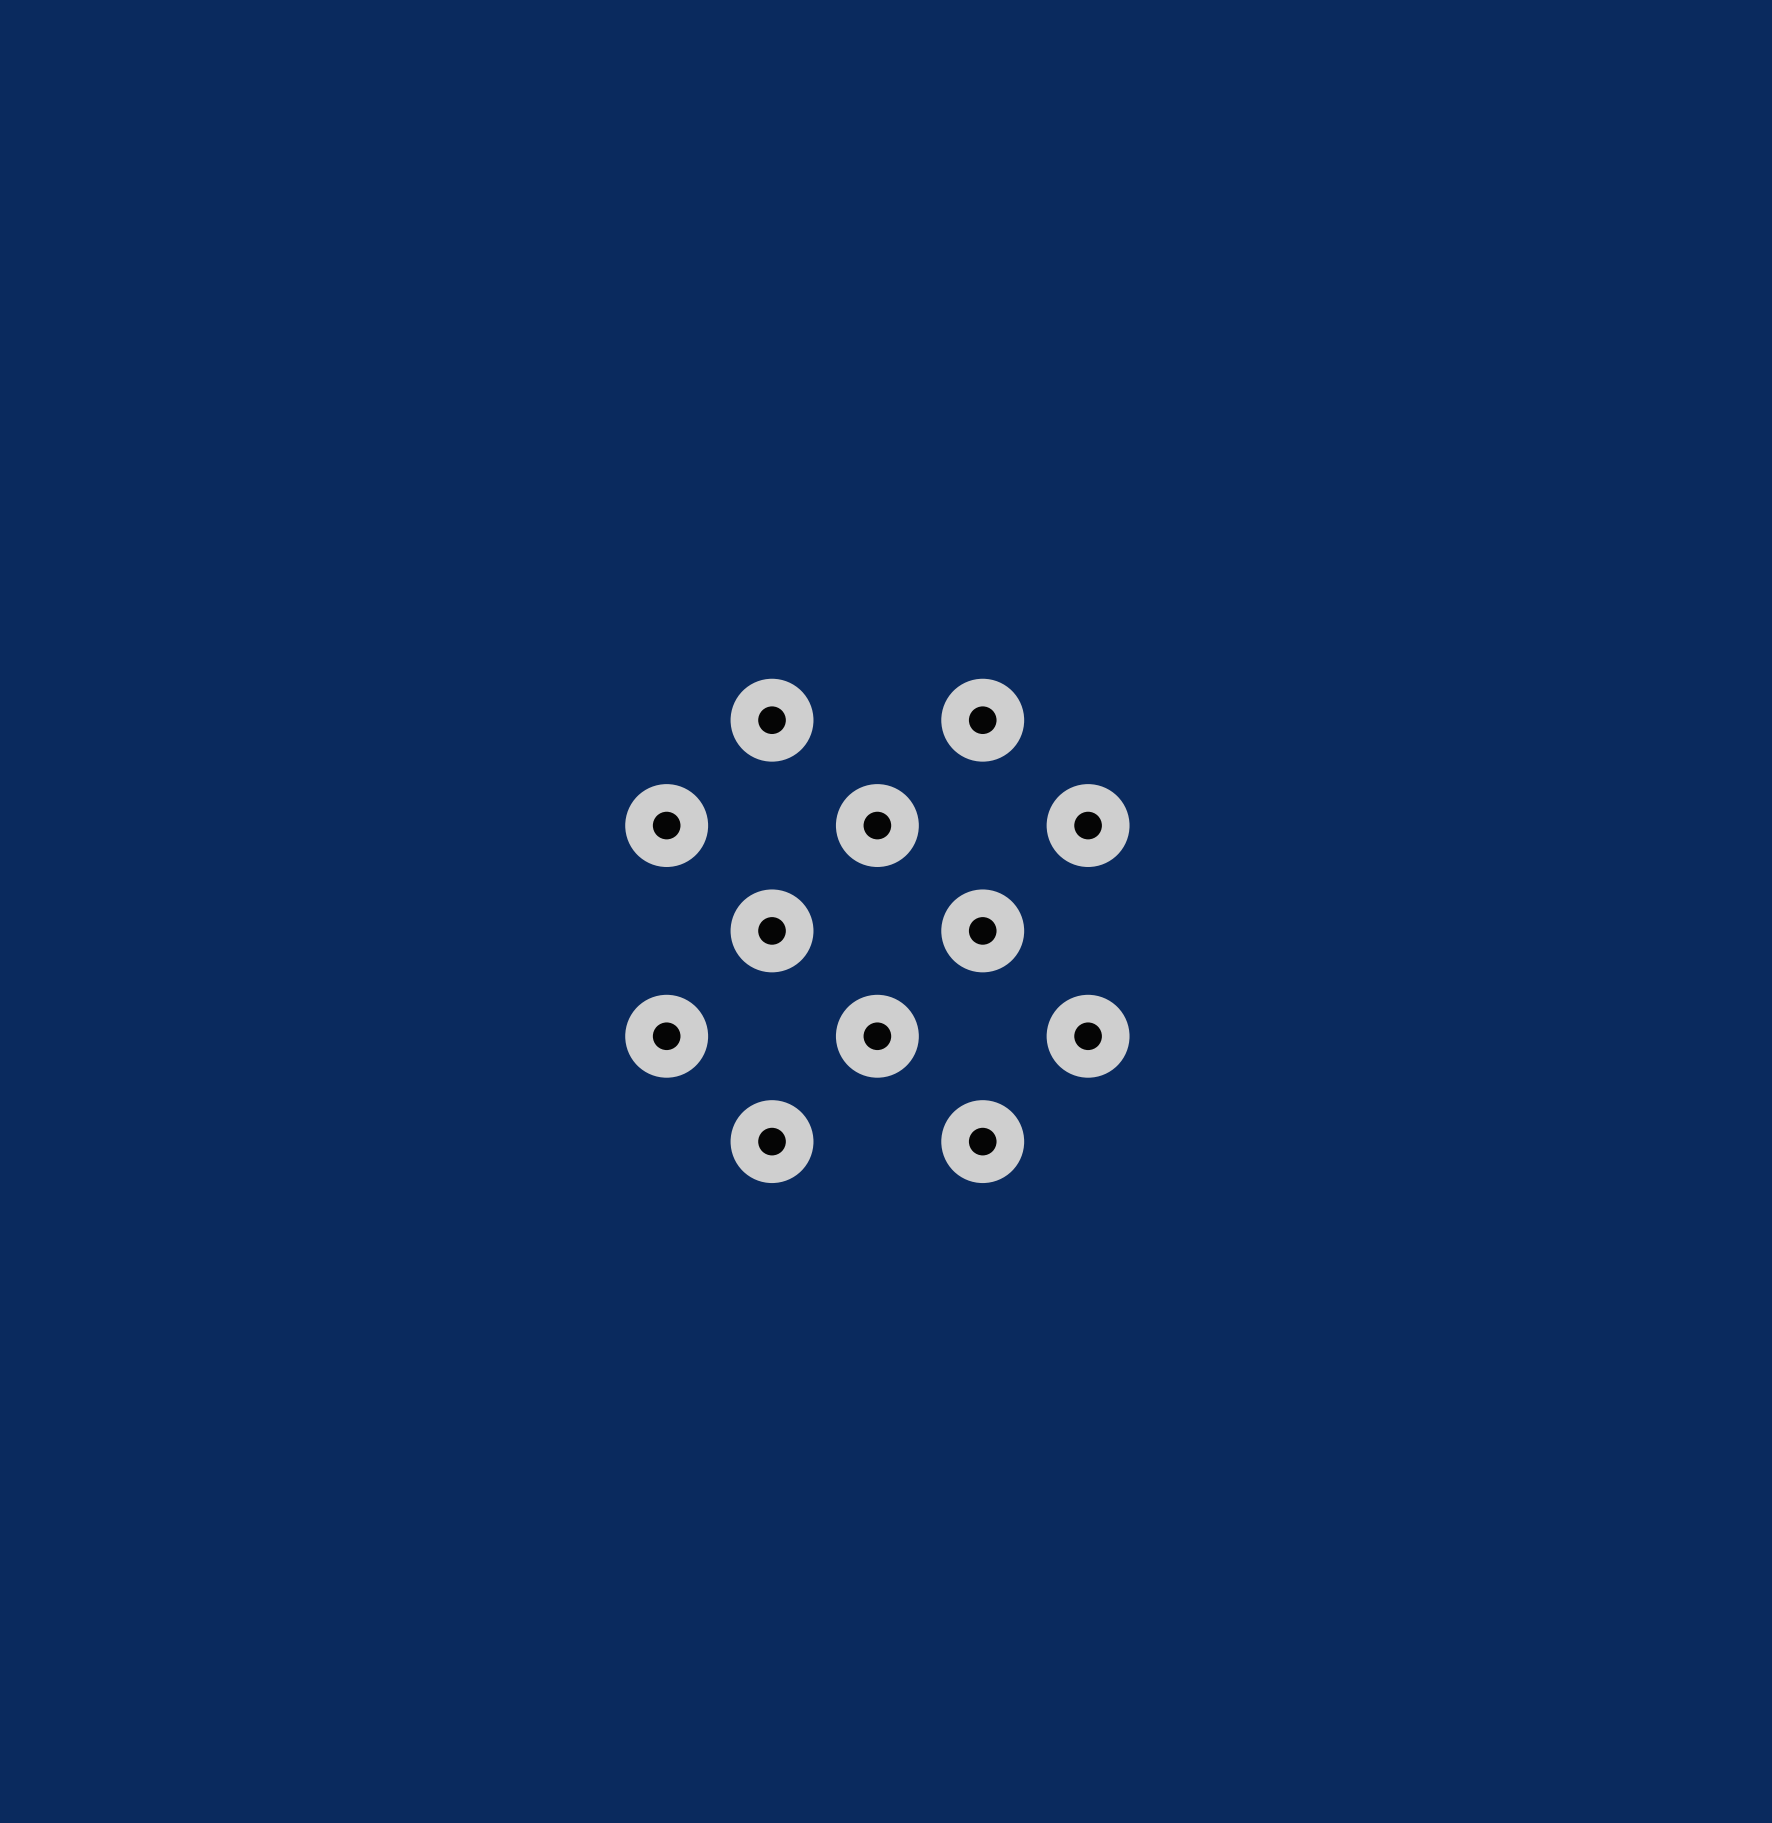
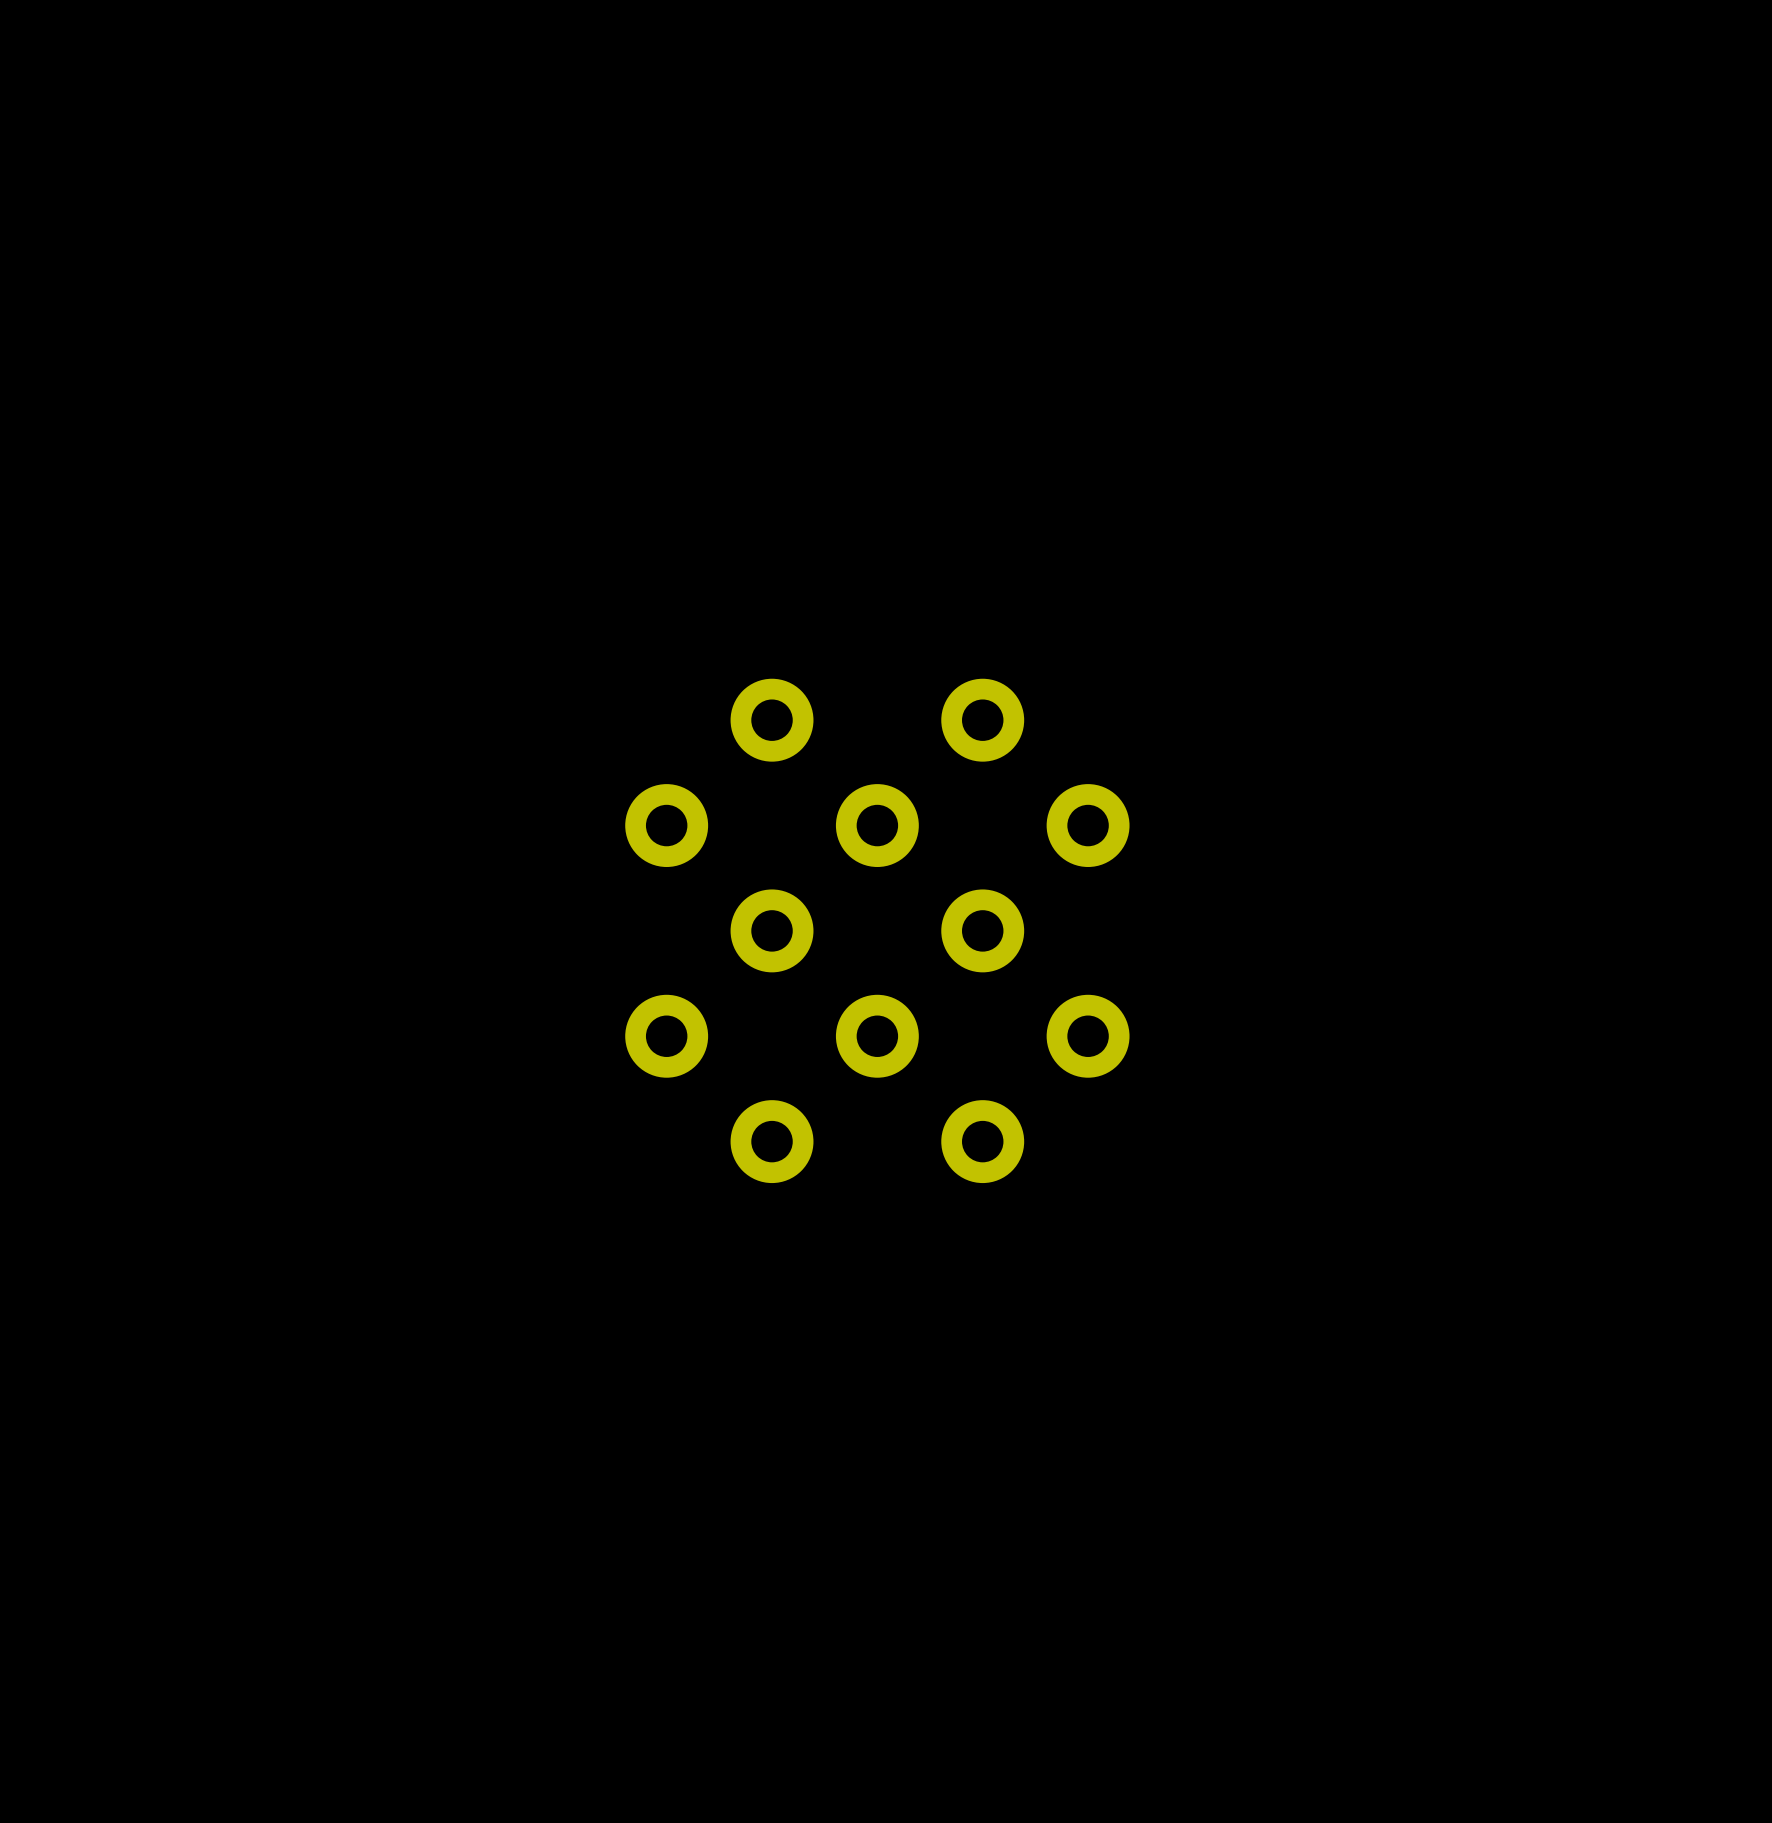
part footprint: [625, 678, 1130, 1184] -> [625, 678, 1130, 1184]

